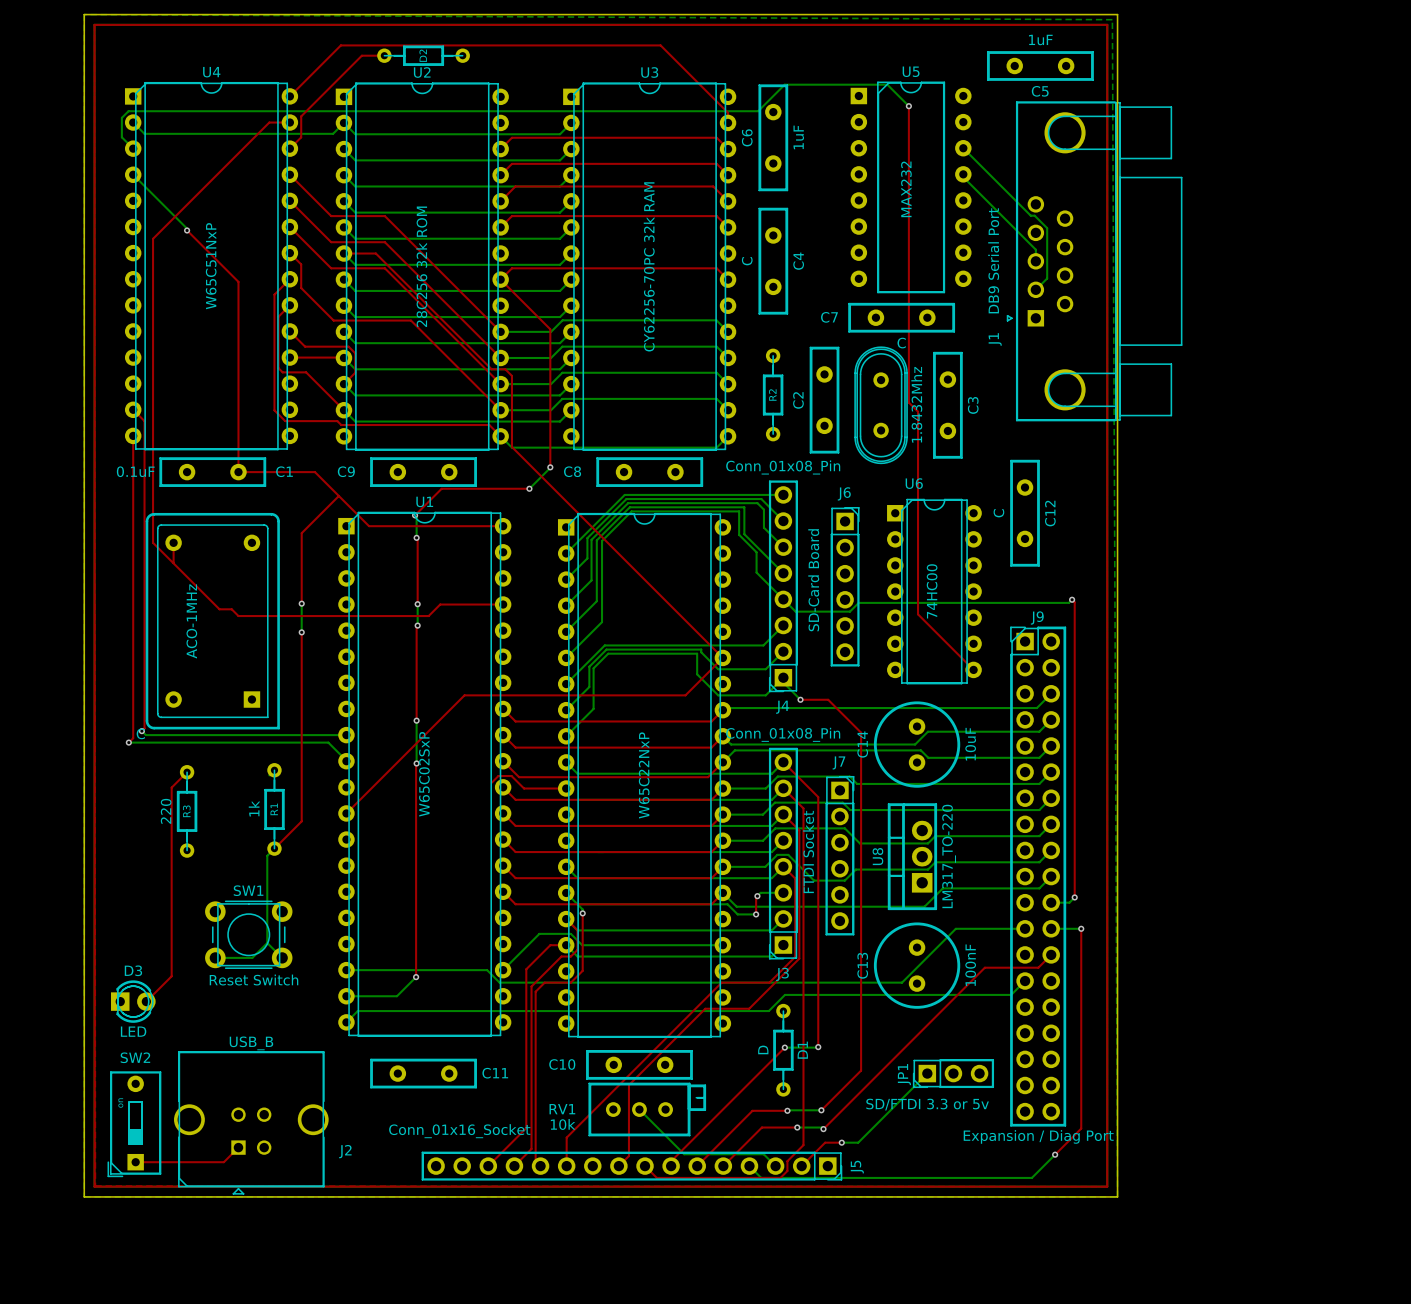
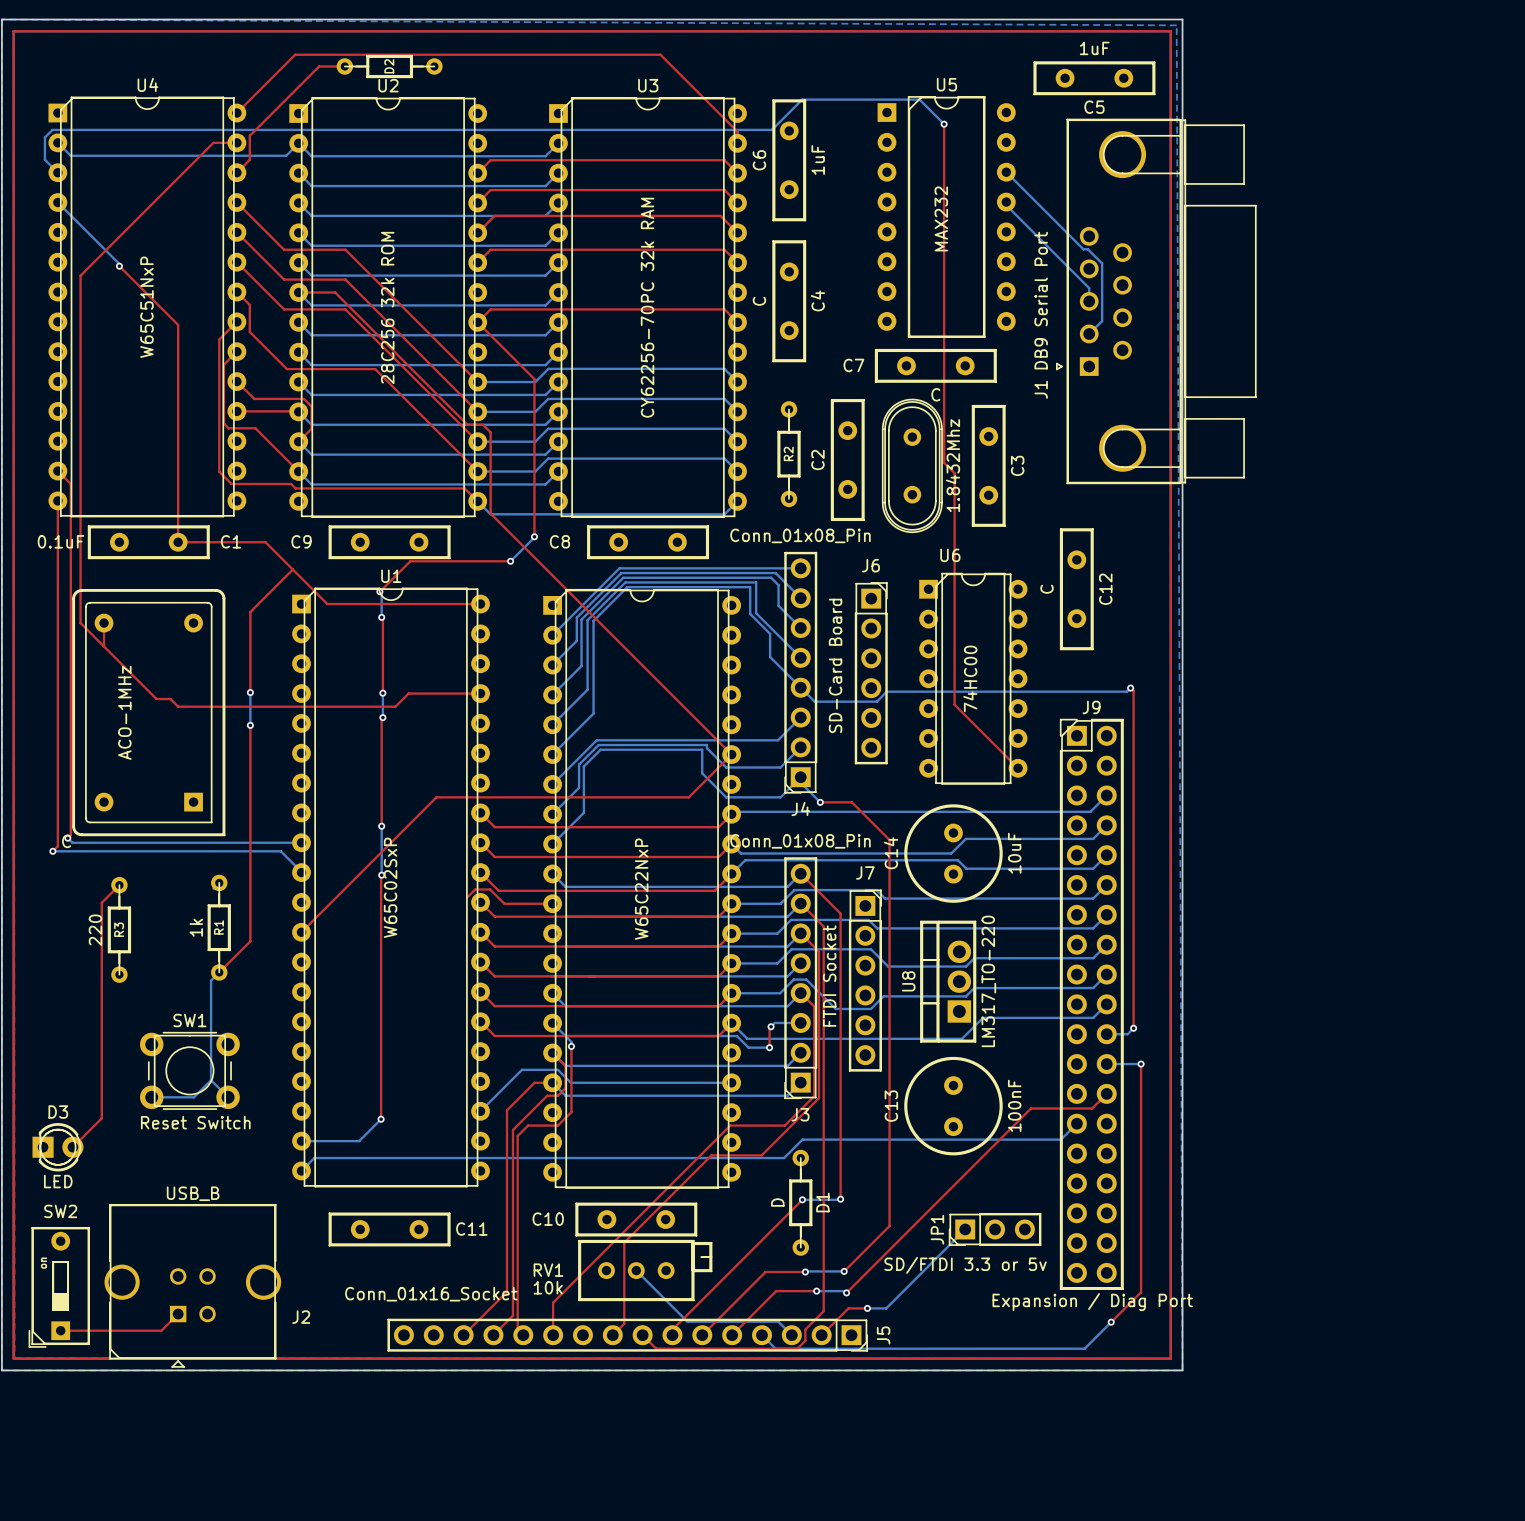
bottom track: (1025, 928) (955, 928) (902, 982) (499, 982) (487, 970) (346, 970) -> none

